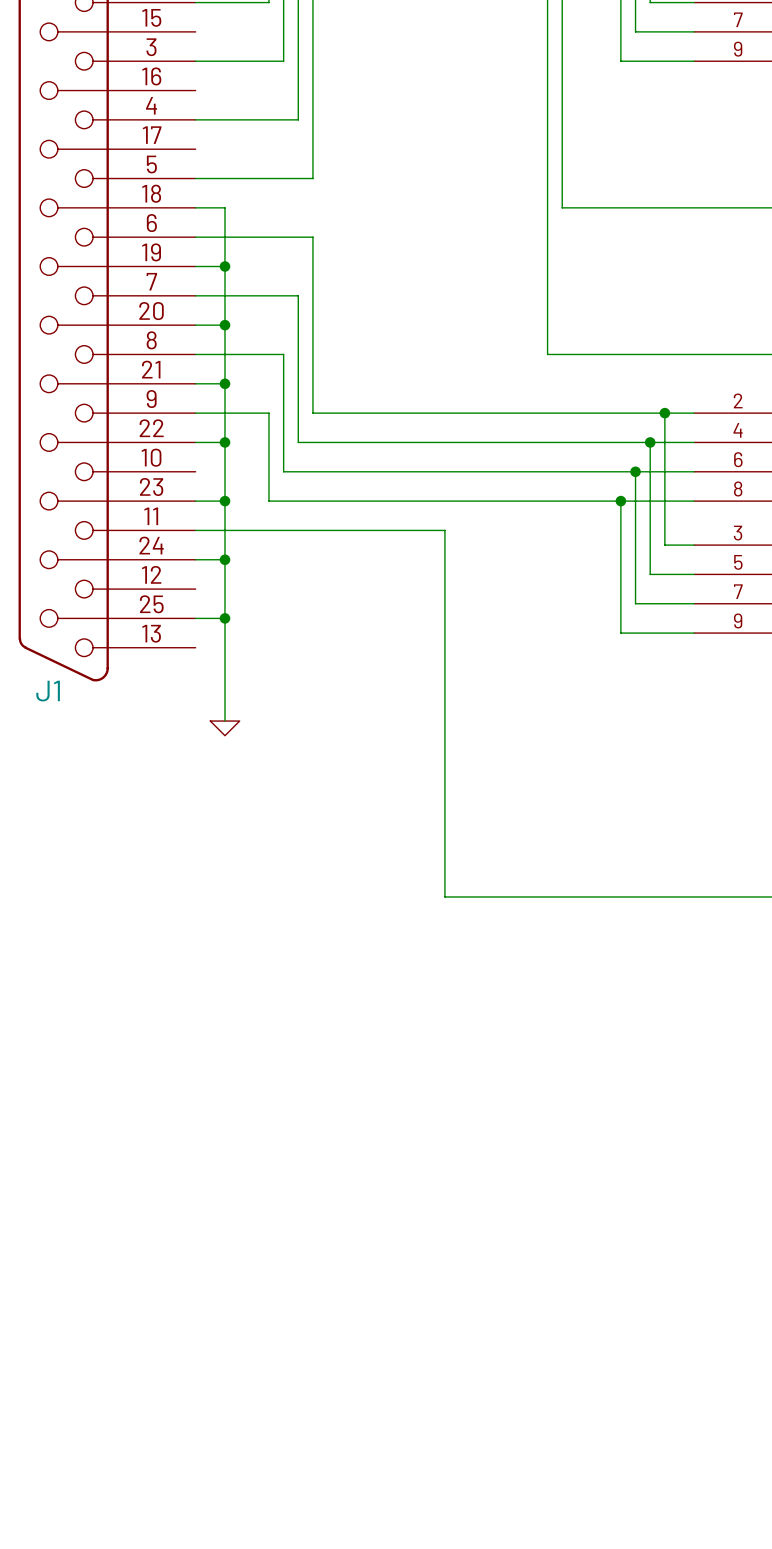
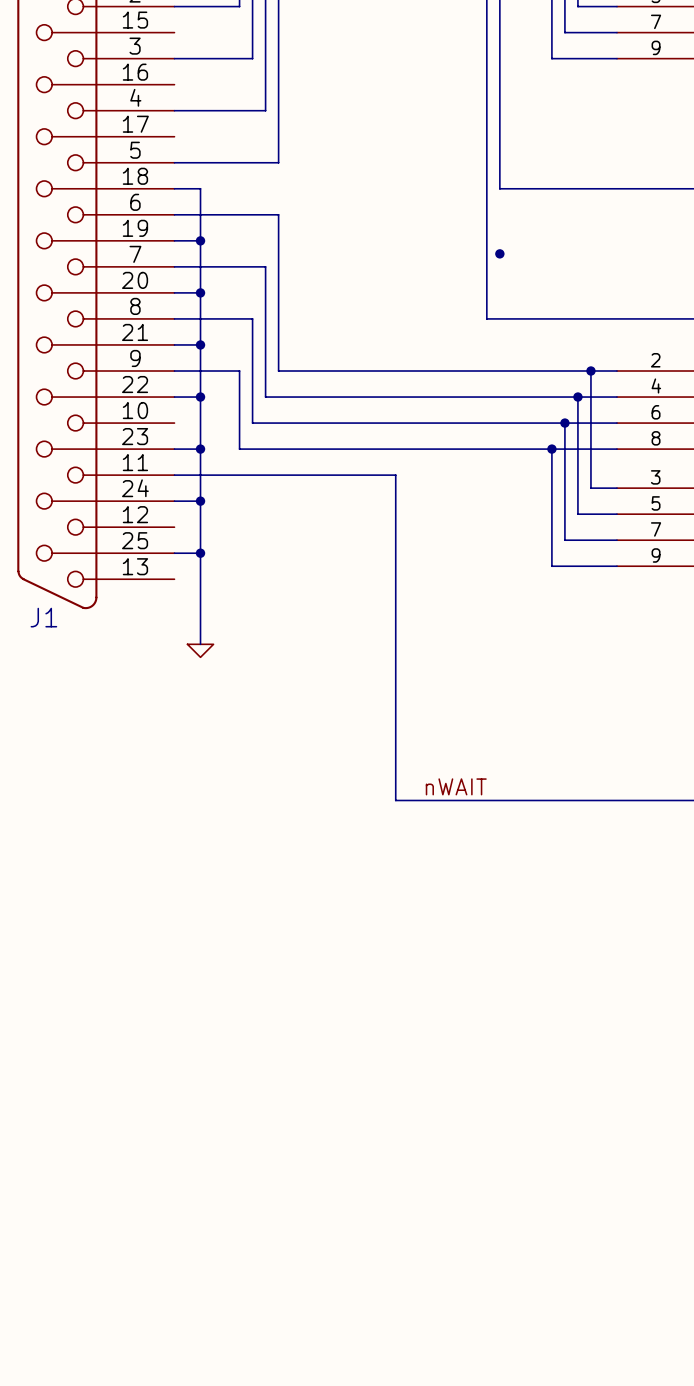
junction: none -> (499, 253)
label: none -> nWAIT (456, 786)

